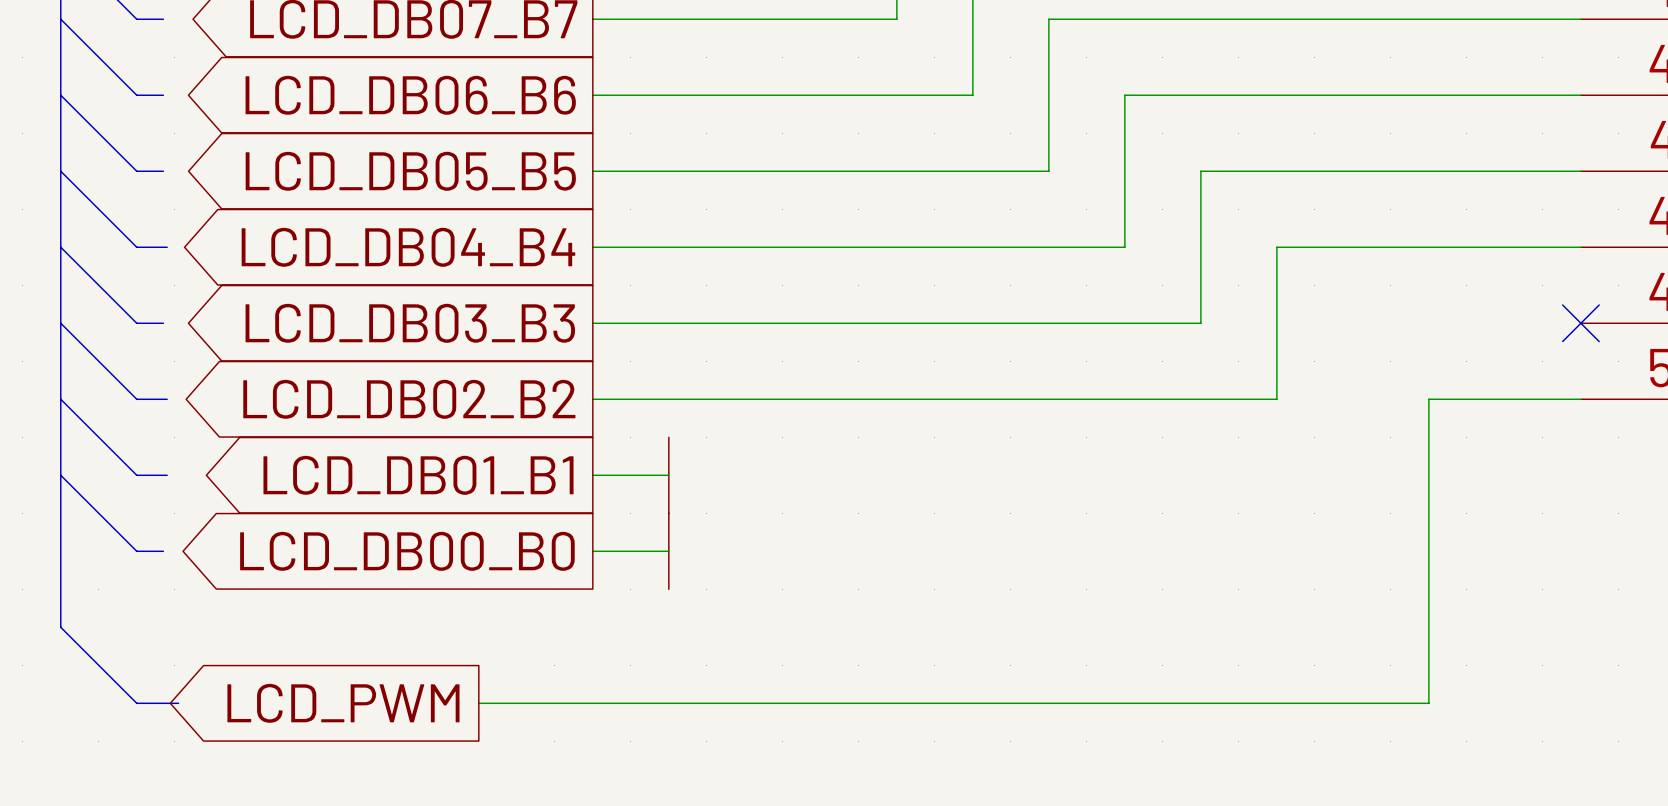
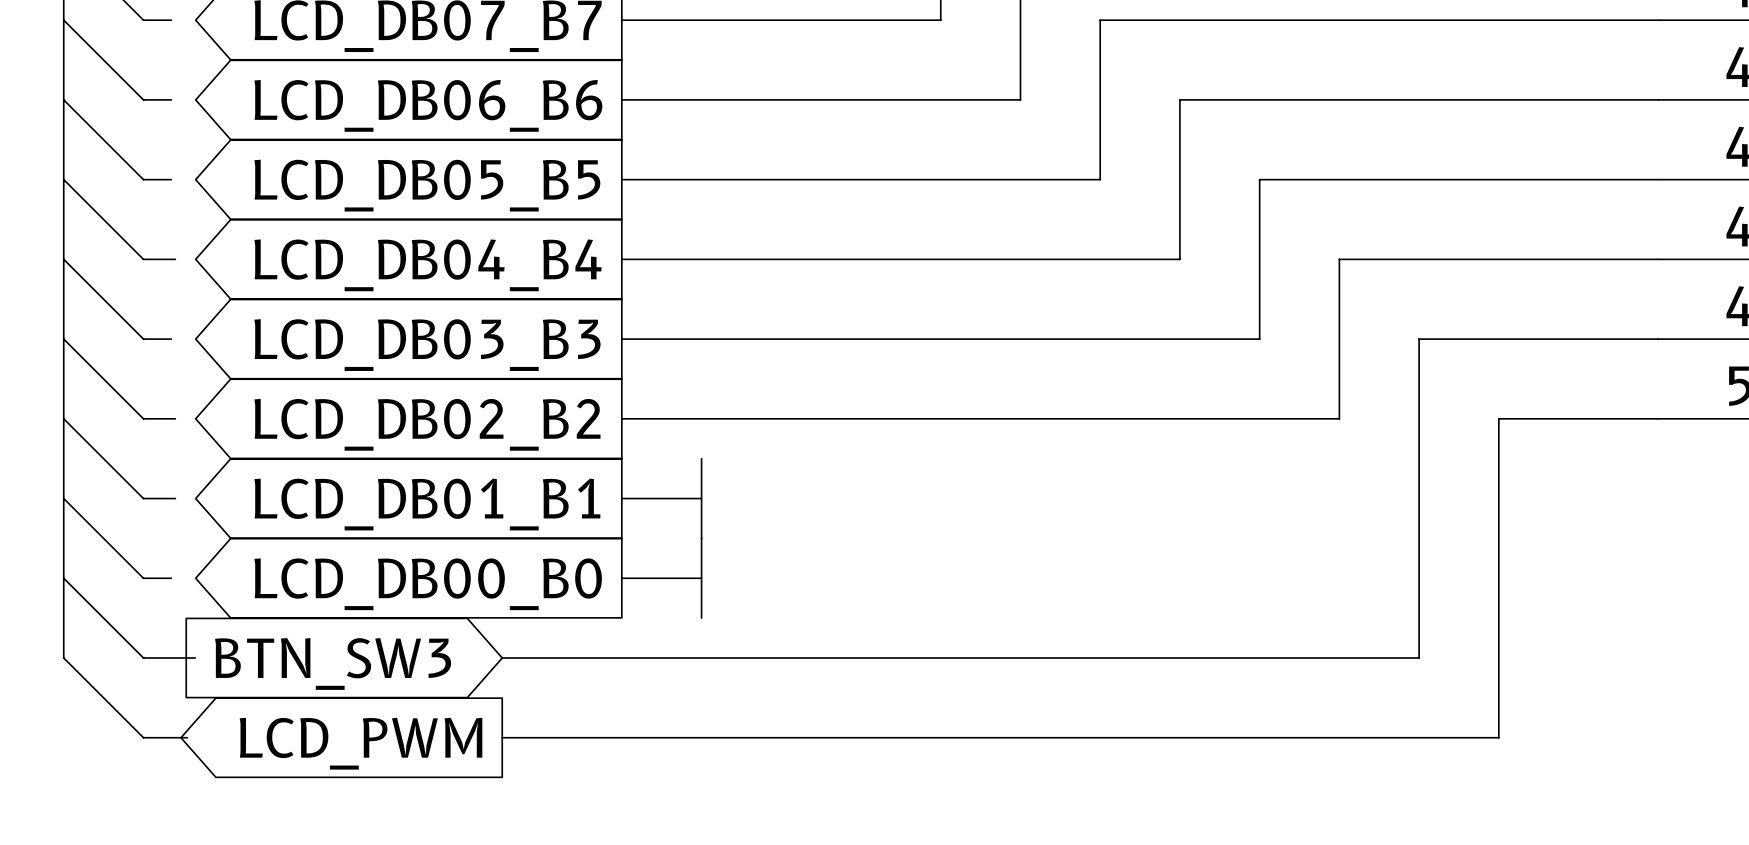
wire: none -> (1658, 339) (1419, 339) (1419, 658) (502, 658)
no-connect mark: (1580, 323) -> none
bus: none -> (63, 578) (143, 658) (195, 658)
global label: none -> BTN_SW3 (333, 663)

